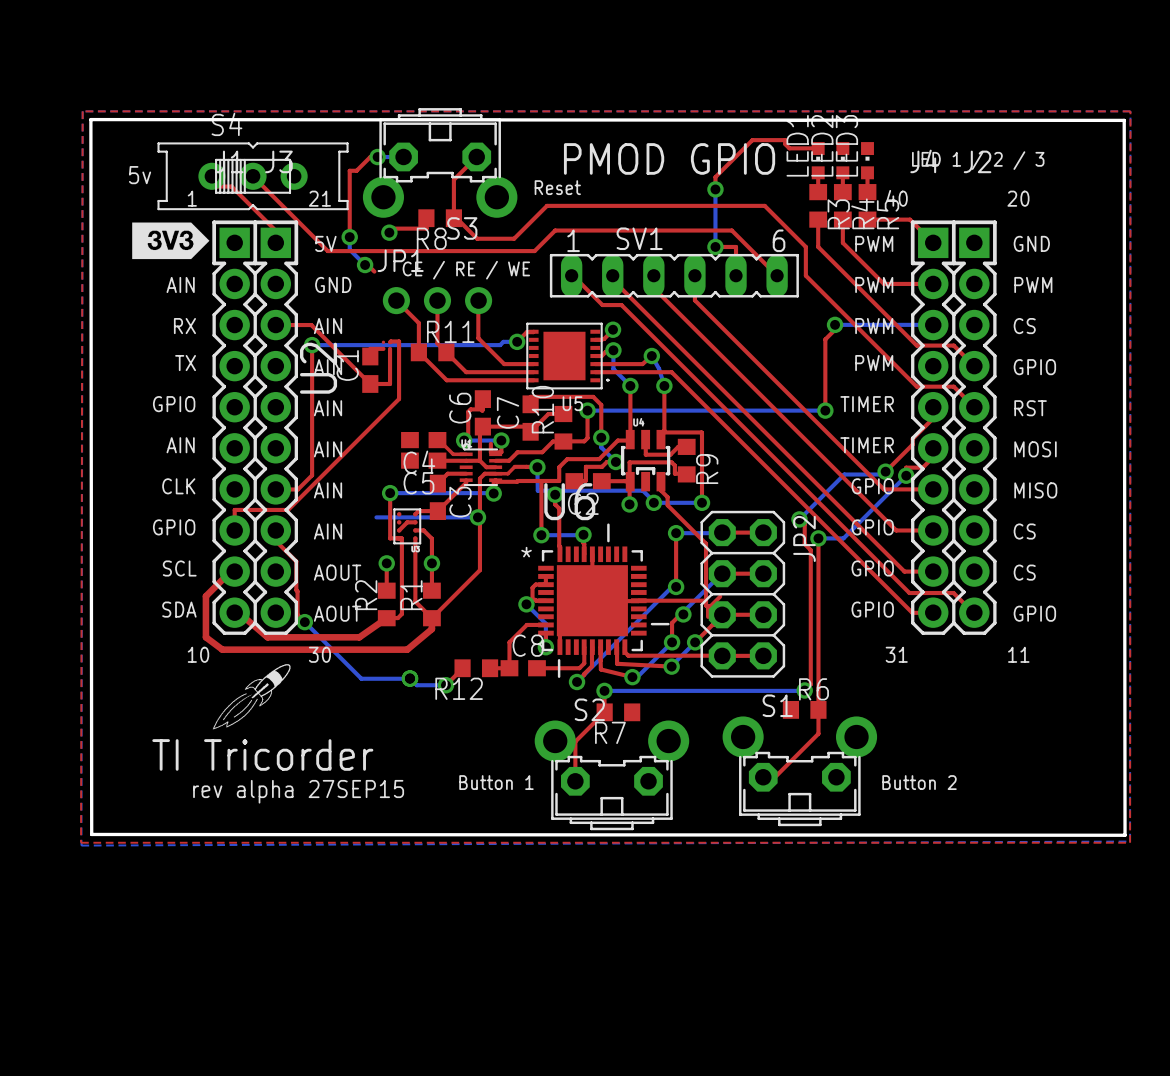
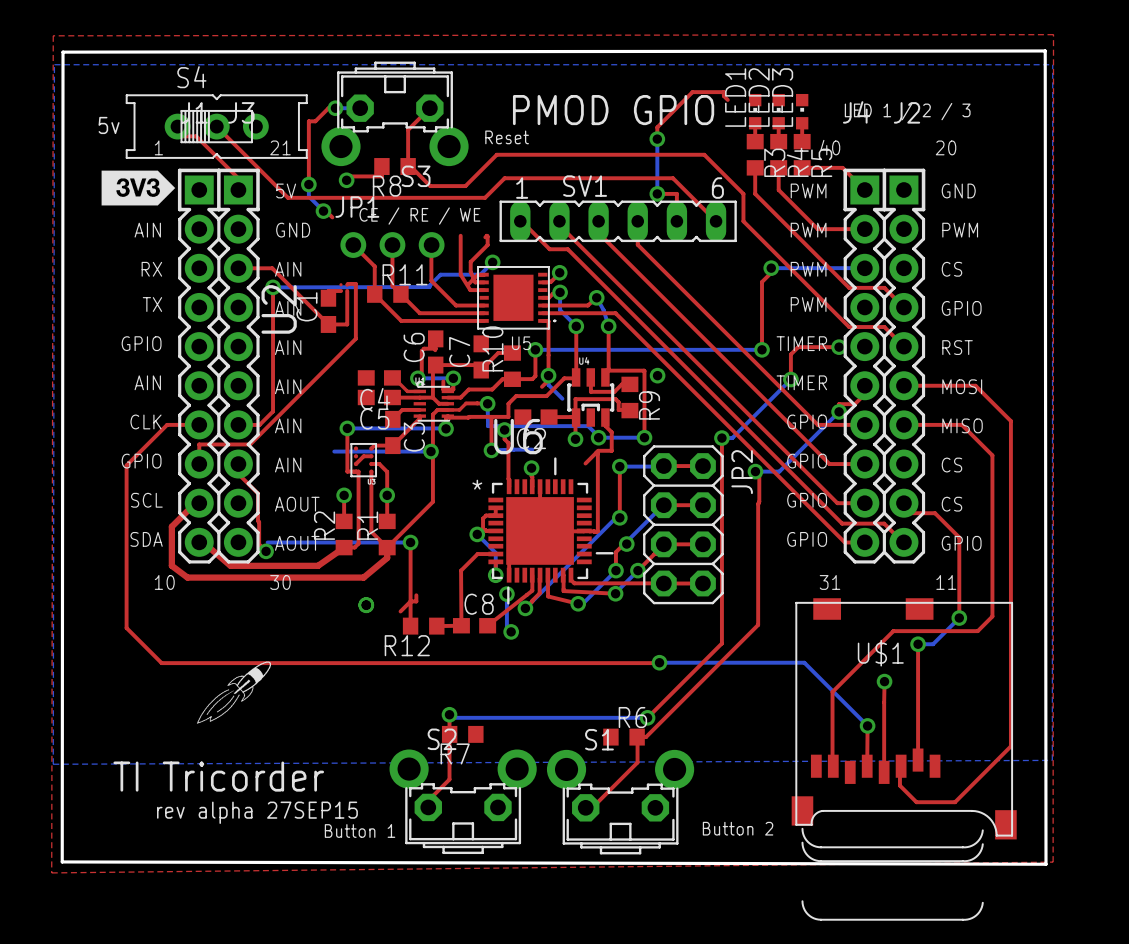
top zone outline: (82, 111) (81, 842) (1130, 842) (1130, 111) (82, 111) -> (1053, 34) (53, 35) (51, 872) (1053, 862) (1053, 34)
board edge: (90, 119) (1124, 120) (1125, 835) (91, 834) (90, 119) -> (1045, 50) (63, 52) (62, 861) (1046, 864) (1045, 50)
top track: (789, 148) (818, 148) -> none
top track: none -> (460, 235) (460, 274) (470, 290) (484, 290)
top track: none -> (485, 237) (487, 236) (487, 245) (470, 261) (470, 272) (475, 282) (484, 282)
bottom track: (517, 341) (503, 341) (500, 345) (312, 345) -> (492, 262) (480, 274) (440, 274) (429, 287) (273, 287)
via position: (517, 341) -> (492, 262)
top track: (530, 404) (530, 396) (593, 396) (601, 404) -> (542, 320) (548, 321) (548, 344)
top track: none -> (839, 347) (798, 347) (790, 354) (790, 379)
via: none -> (839, 347)
top track: (933, 407) (933, 418) (912, 438) (912, 444) (885, 471) -> none
top track: none -> (548, 375) (548, 380) (541, 386)
via: none -> (657, 375)
bottom track: none -> (790, 379) (732, 438) (721, 438)
via: none -> (790, 379)
top track: none -> (903, 385) (975, 385) (1010, 421) (1010, 746) (955, 802) (916, 802) (899, 785) (901, 766)
top track: (615, 461) (606, 461) (602, 466) (585, 466) (585, 480) (574, 480) -> none
via: (615, 461) -> none
bottom track: (885, 471) (882, 474) (844, 474) (799, 519) -> none
via: (885, 471) -> none
top track: none -> (199, 424) (167, 424) (126, 465) (126, 628) (161, 663) (659, 662)
top track: none -> (903, 424) (961, 424) (992, 455) (992, 616) (977, 631) (893, 631) (832, 692) (833, 766)
top track: none -> (721, 438) (721, 643) (647, 717)
top track: (667, 505) (706, 543) (706, 605) (708, 606) -> (611, 440) (611, 450) (598, 450) (585, 463)
bottom track: none -> (532, 449) (491, 450)
top track: (541, 516) (541, 535) -> none
top track: (799, 519) (804, 524) (804, 544) (810, 550) (810, 684) (804, 690) -> none
via position: (799, 519) -> (721, 438)
bottom track: (583, 534) (541, 535) -> none
via position: (541, 535) -> (491, 450)
top track: (818, 538) (818, 733) (774, 777) (763, 777) -> none
top track: none -> (759, 475) (758, 624) (646, 737) (637, 737) (637, 762) (592, 807) (585, 807)
top track: none -> (903, 503) (903, 513) (935, 513) (959, 537) (959, 618)
top track: (720, 596) (710, 606) (708, 606) -> none
top track: (644, 600) (706, 600) -> (589, 530) (597, 531) (596, 452)
top track: (708, 606) (708, 616) -> none
bottom track: none -> (267, 542) (410, 542)
top track: none -> (410, 542) (410, 626)
via: none -> (410, 542)
bottom track: (304, 622) (361, 678) (409, 678) -> none
top track: (509, 642) (509, 668) (490, 668) -> (461, 570) (461, 625) (436, 626)
top track: (584, 663) (579, 668) (536, 668) -> (532, 590) (487, 625)
bottom track: none -> (506, 594) (506, 628) (511, 631)
via: none -> (506, 594)
R12 position: (476, 668) -> (423, 626)
C8 position: (523, 668) -> (474, 625)
bottom track: (409, 678) (416, 685) (445, 685) -> none
via: (445, 685) -> none
top track: (604, 690) (604, 712) (575, 741) (575, 781) -> none
via: (604, 690) -> none
bottom track: (804, 690) (604, 690) -> none
via: (804, 690) -> none
bottom track: none -> (959, 618) (933, 644) (918, 644)
via: none -> (959, 618)
drawing position: (251, 696) -> (233, 692)
via: none -> (511, 631)
R6 position: (804, 709) -> (624, 737)
R7 position: (618, 712) -> (462, 734)
top track: none -> (918, 644) (918, 760)
via: none -> (918, 644)
bottom track: none -> (659, 662) (804, 662) (867, 725)
via: none -> (659, 662)
text position: TI Tricorder (262, 754) -> TI Tricorder (218, 776)
top track: none -> (884, 681) (884, 772)
via: none -> (884, 681)
S1 position: (799, 771) -> (620, 802)
S2 position: (611, 775) -> (463, 801)
text position: Button 1 (496, 782) -> Button 1 (360, 830)
text position: Button 2 (919, 782) -> Button 2 (738, 828)
text position: rev alpha 27SEP15 (298, 791) -> rev alpha 27SEP15 (257, 812)
top track: none -> (449, 714) (449, 779) (431, 797) (428, 797) (428, 807)
bottom track: none -> (449, 714) (452, 717) (647, 717)
via: none -> (449, 714)
via: none -> (647, 717)
top track: none -> (867, 725) (867, 766)
via: none -> (867, 725)
U$1: none -> (904, 759)

